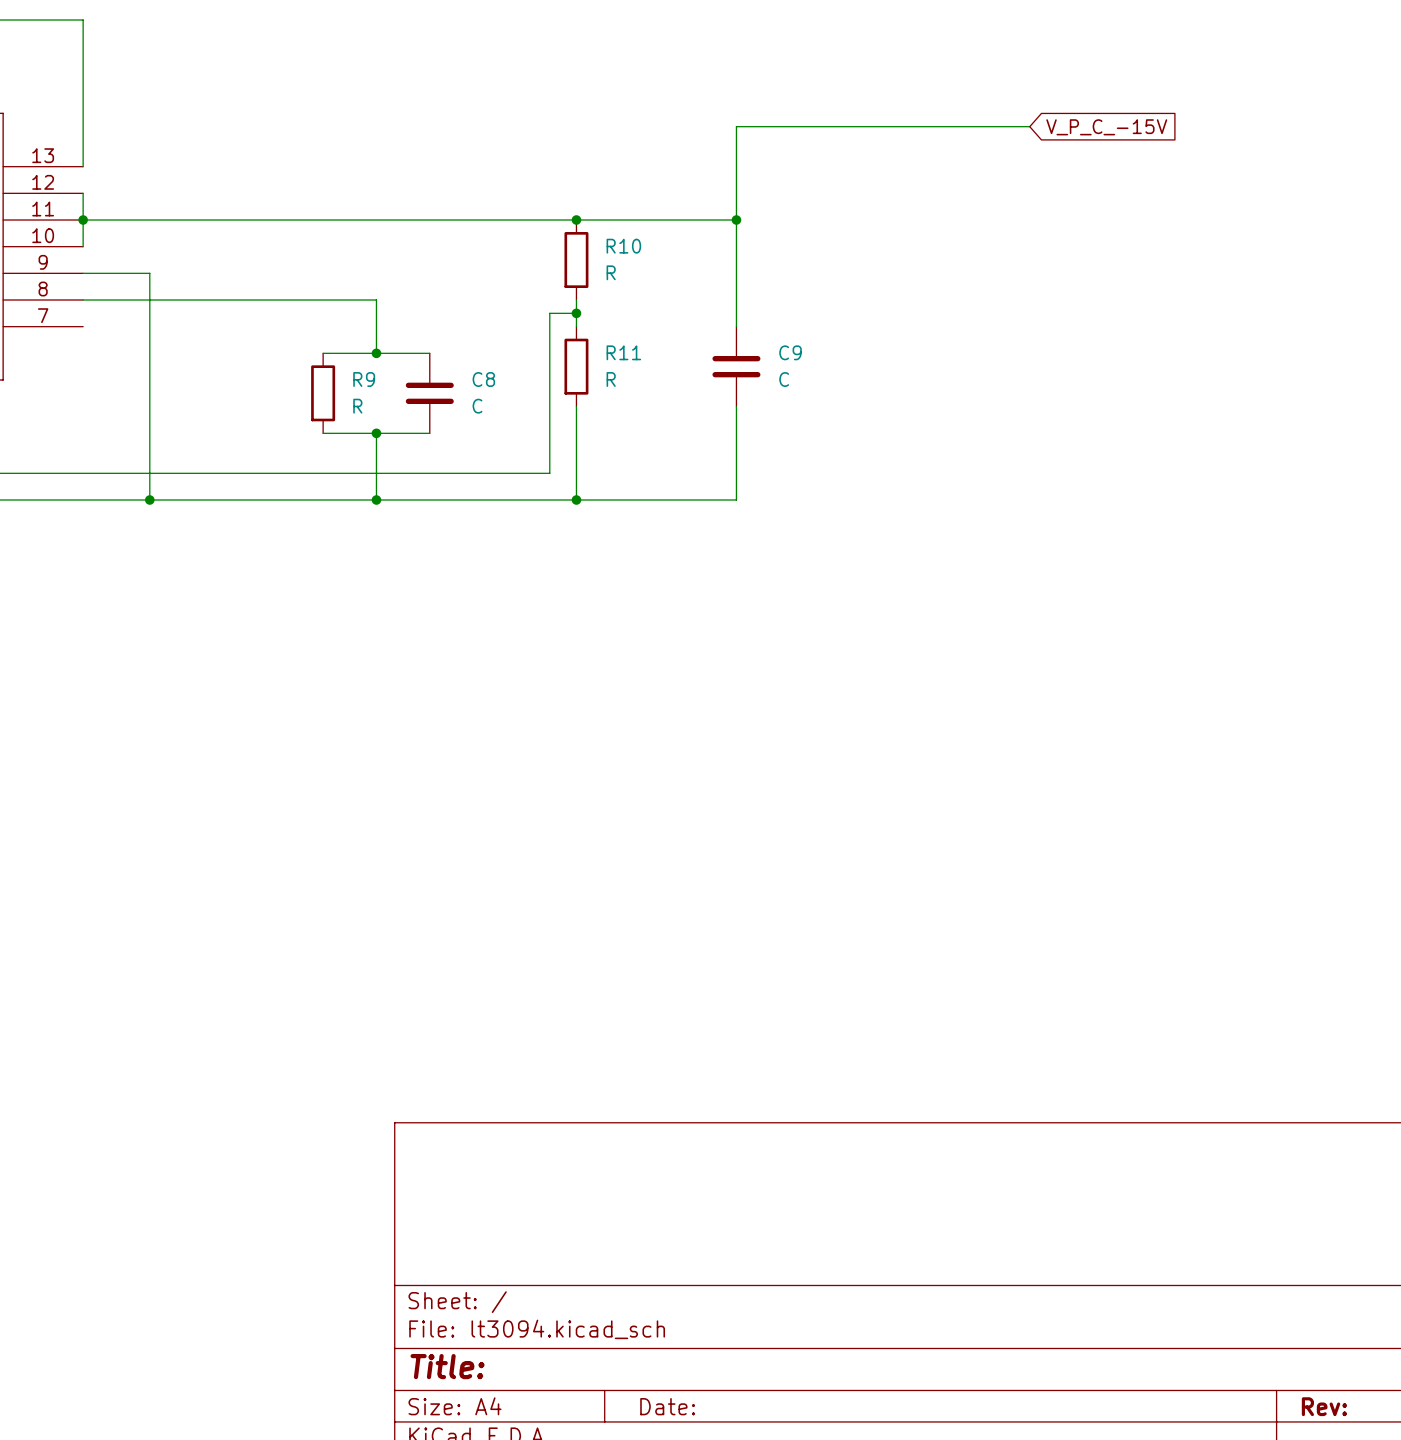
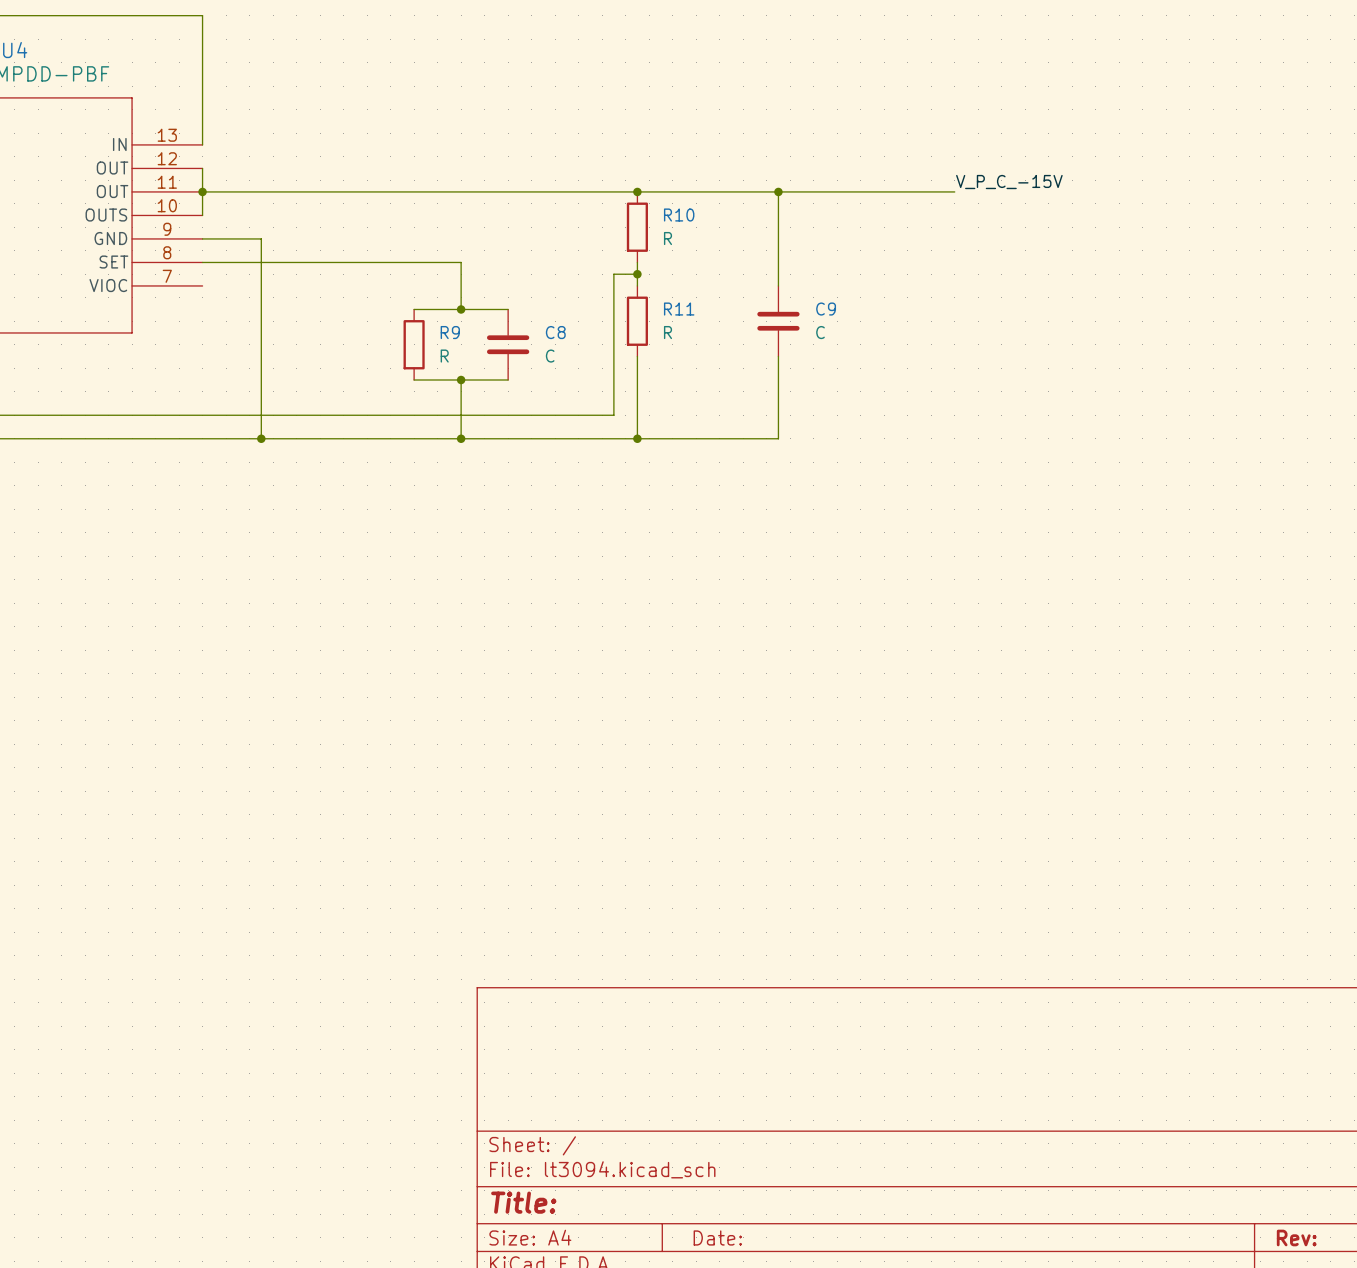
wire: (1029, 126) (736, 126) (736, 220) -> (954, 191) (778, 191)
global label: V_P_C_-15V (1106, 127) -> none
label: none -> V_P_C_-15V (1009, 182)

